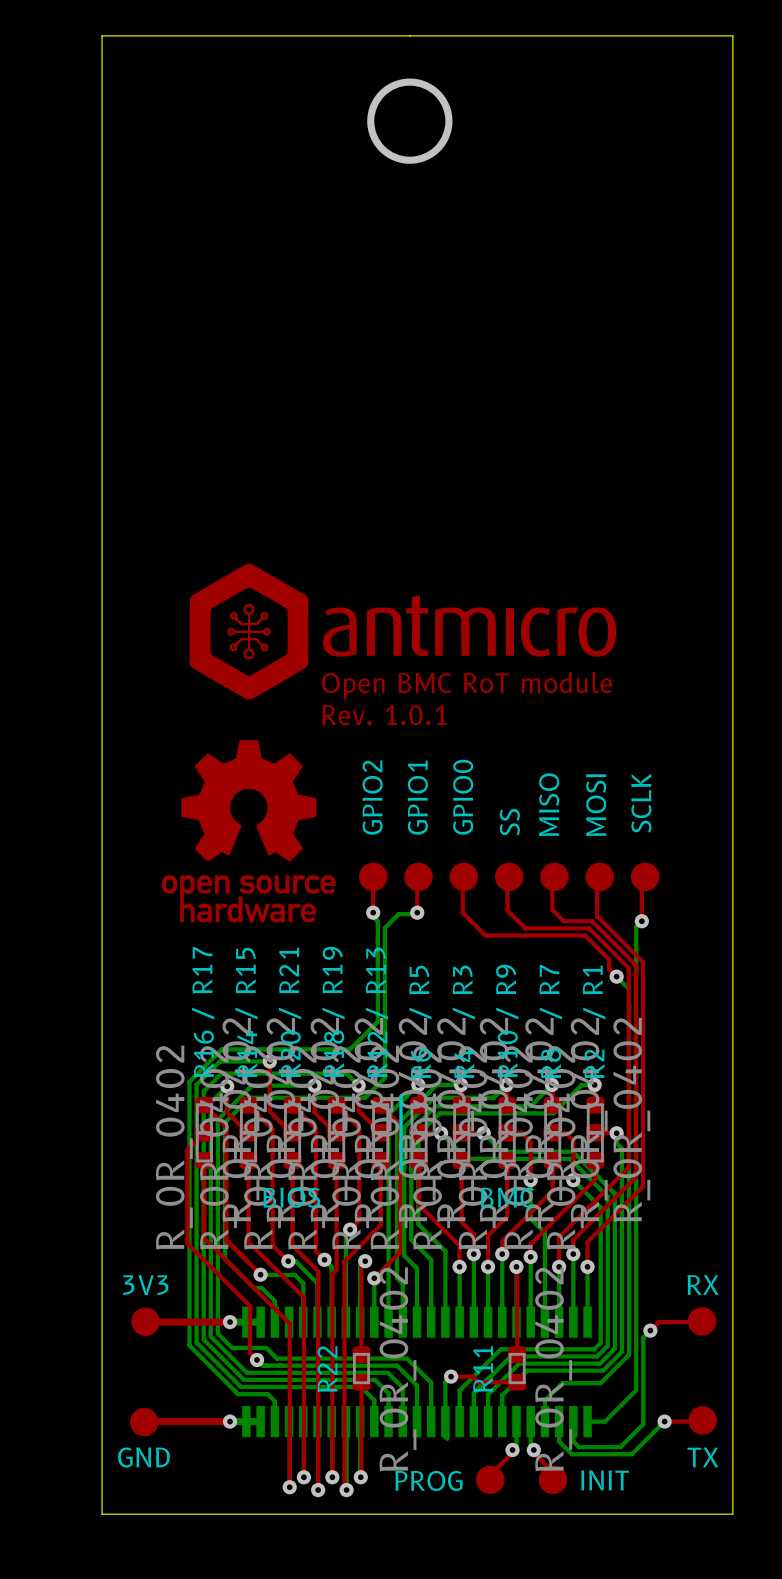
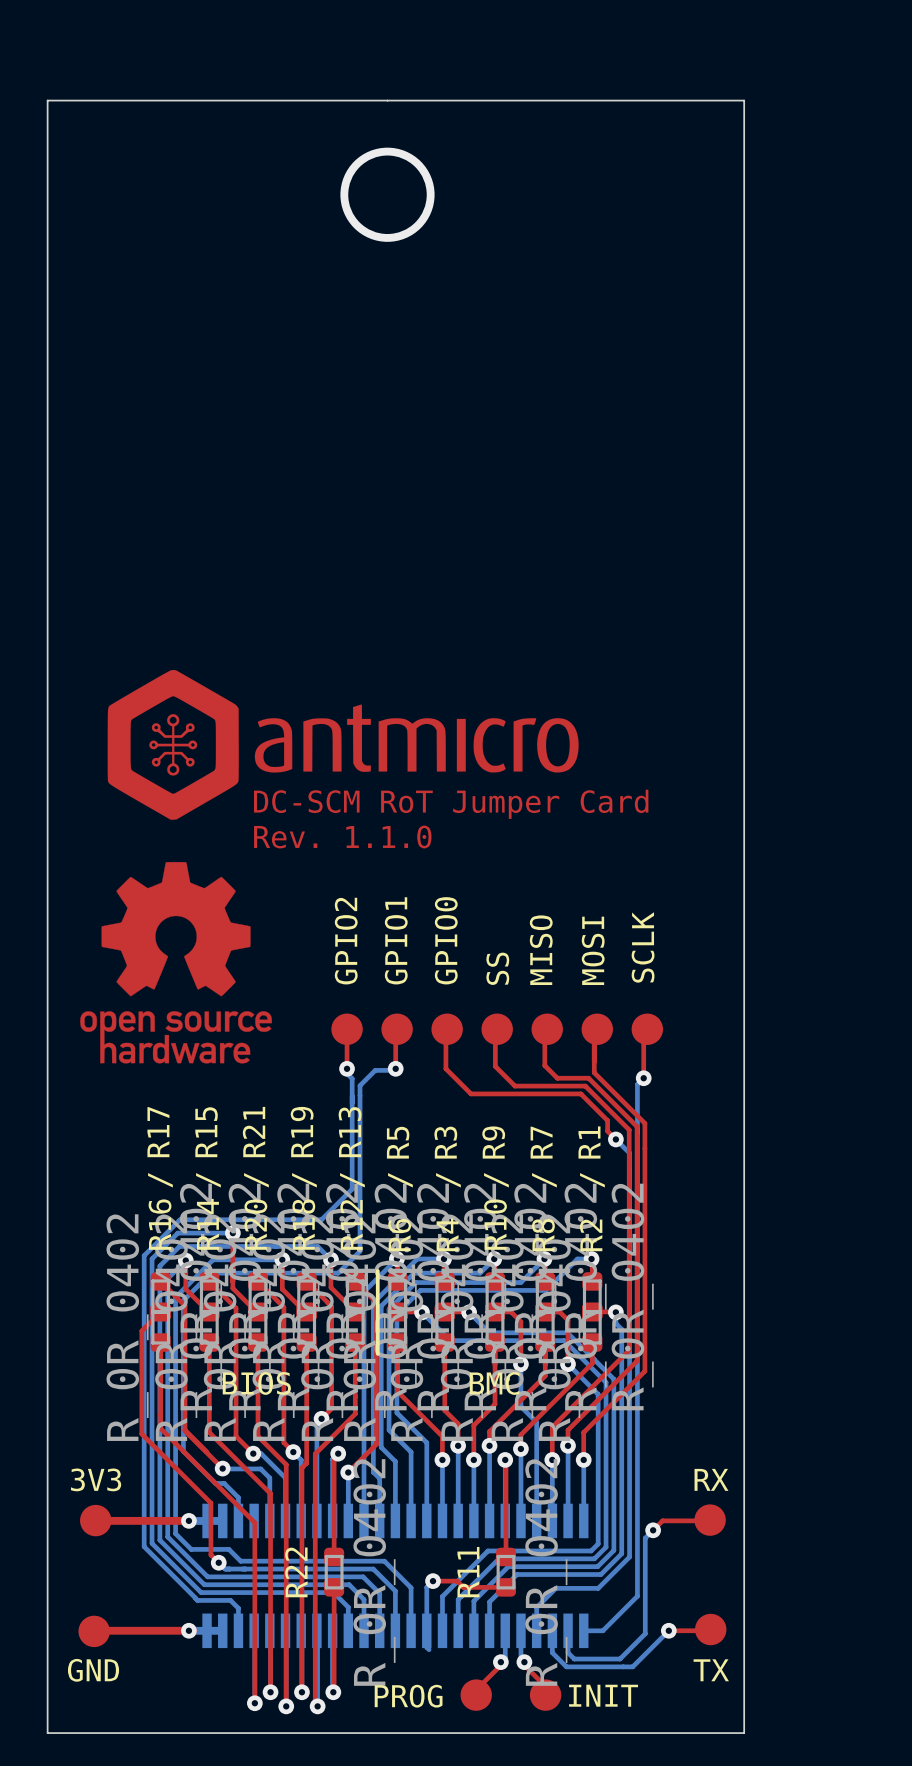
drawing position: (402, 631) -> (343, 744)
text: none -> DC-SCM RoT Jumper Card (451, 804)
text: Open BMC RoT module (467, 685) -> none
text: Rev. 1.0.1 (384, 715) -> Rev. 1.1.0 (342, 837)
drawing position: (248, 831) -> (176, 962)

